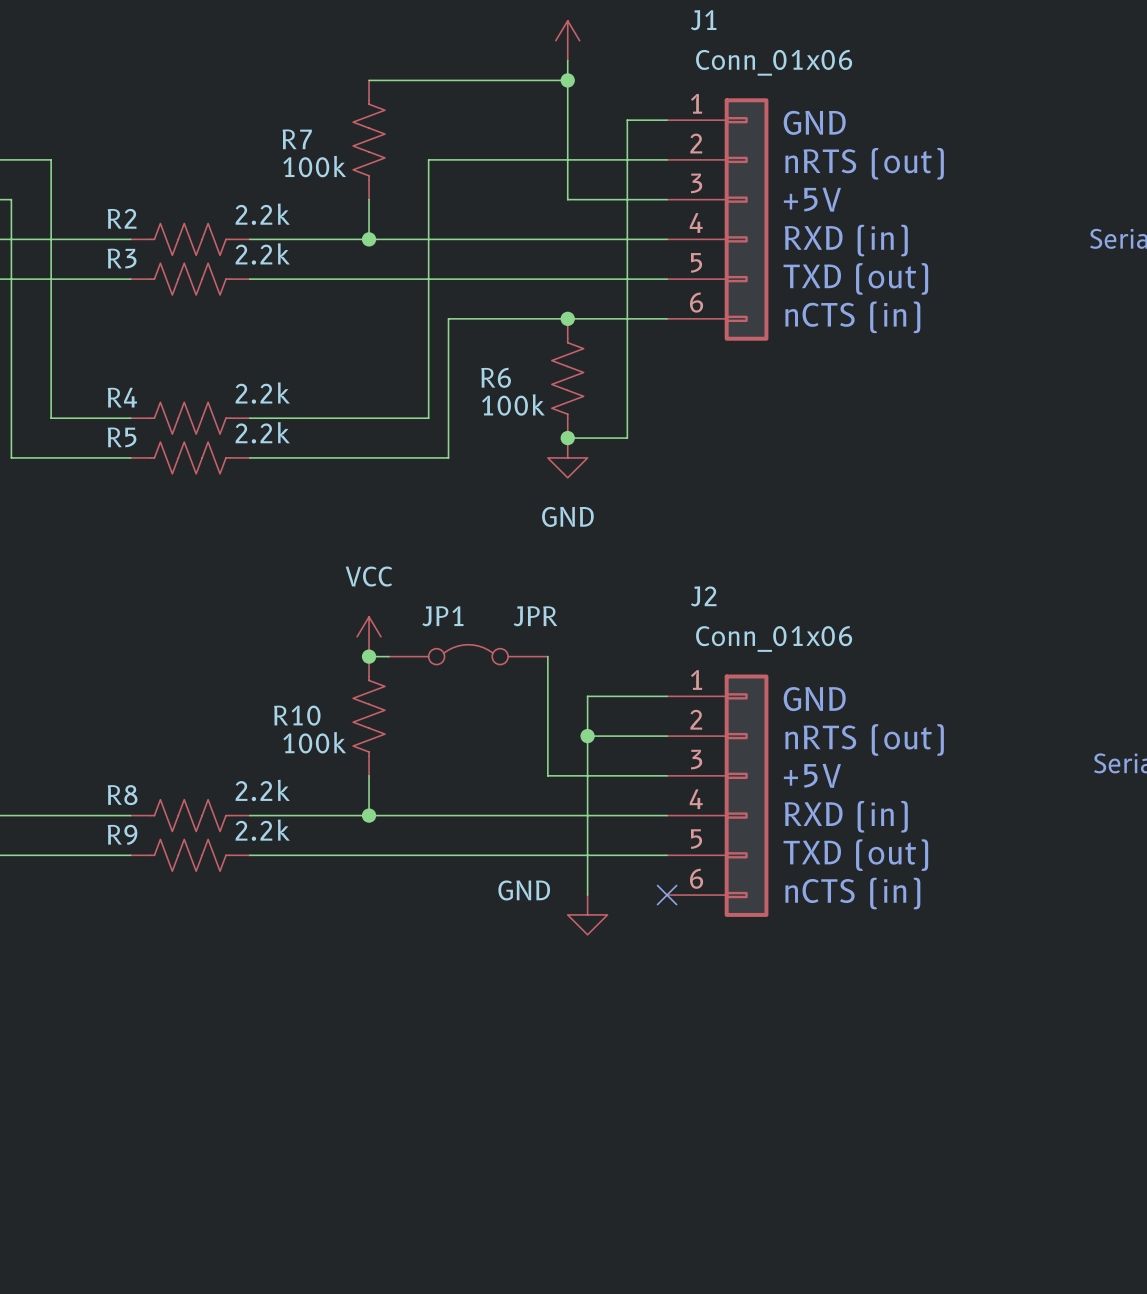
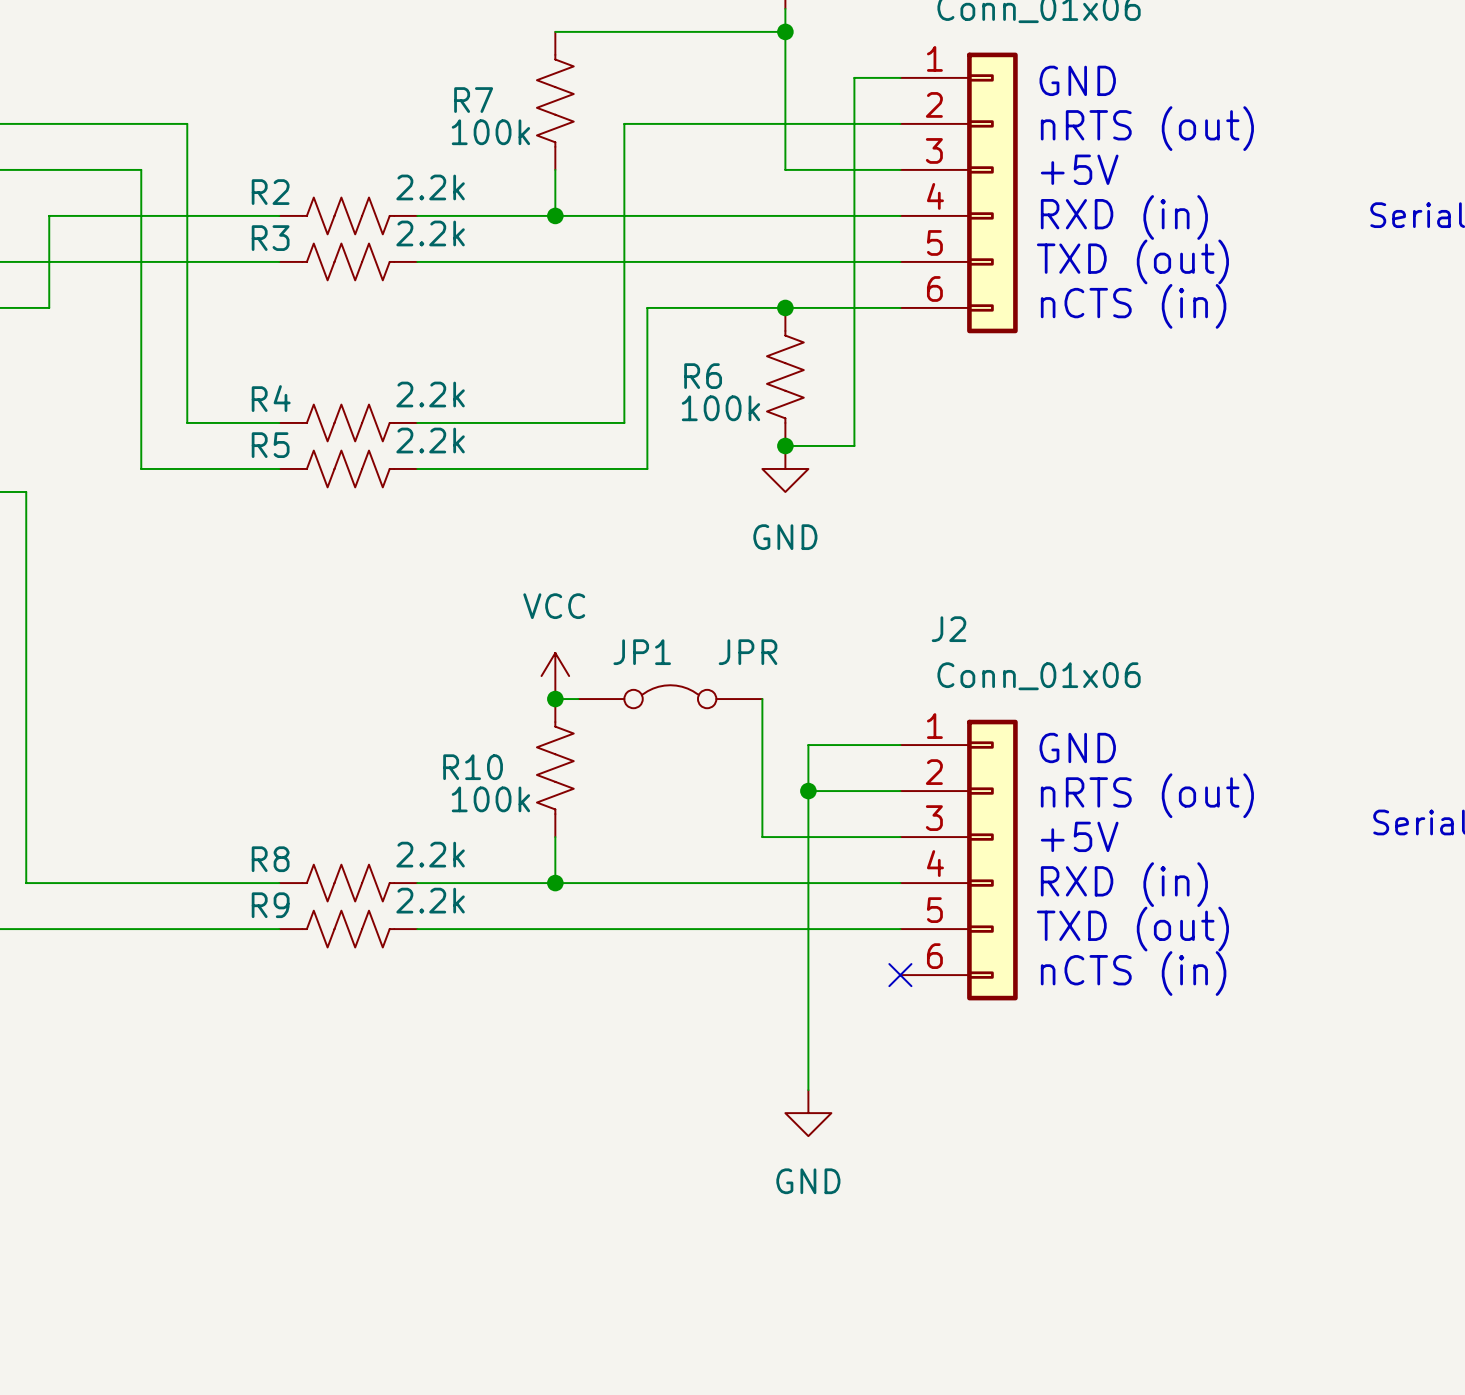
power symbol text position: GND (524, 890) -> GND (808, 1181)
wire: none -> (808, 975) (808, 1090)
power symbol position: GND (587, 914) -> GND (808, 1113)

